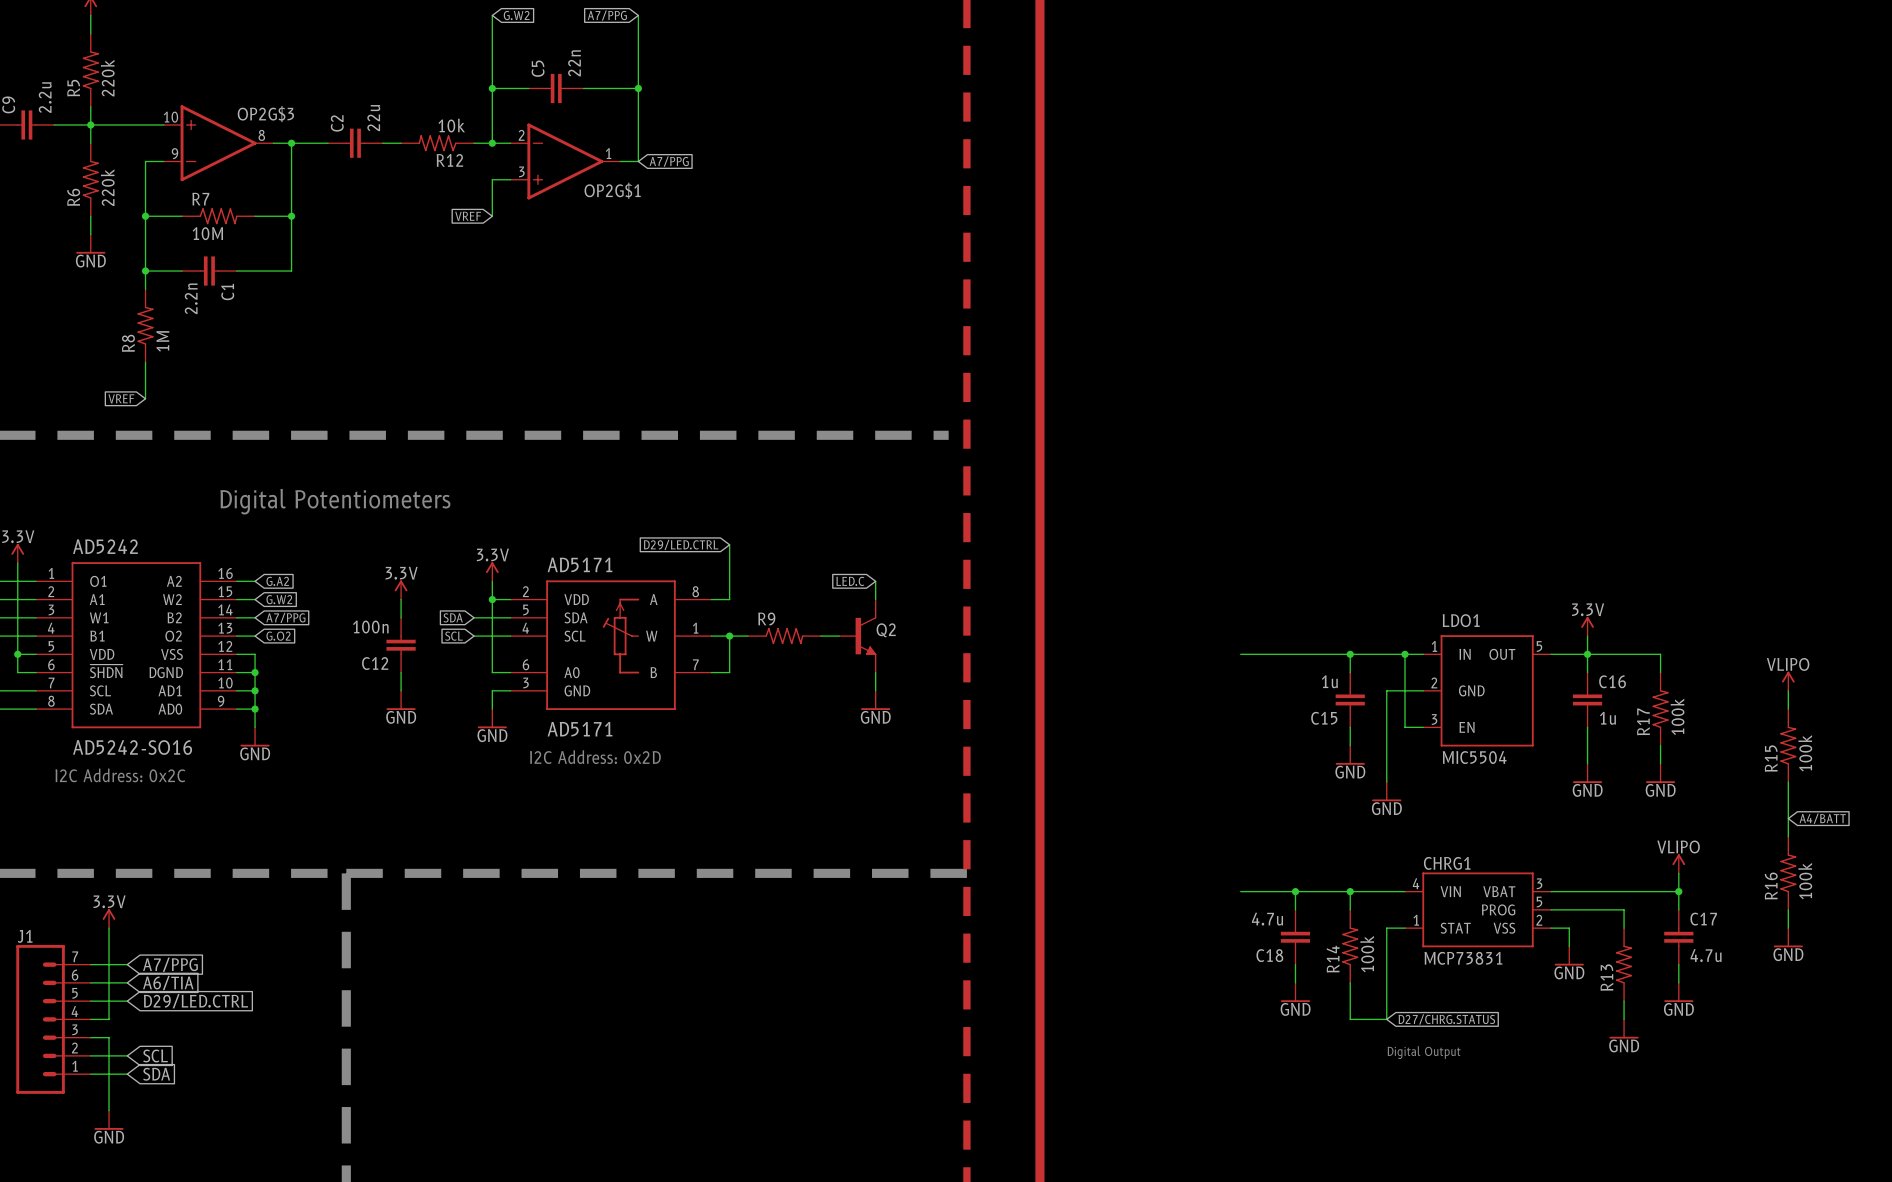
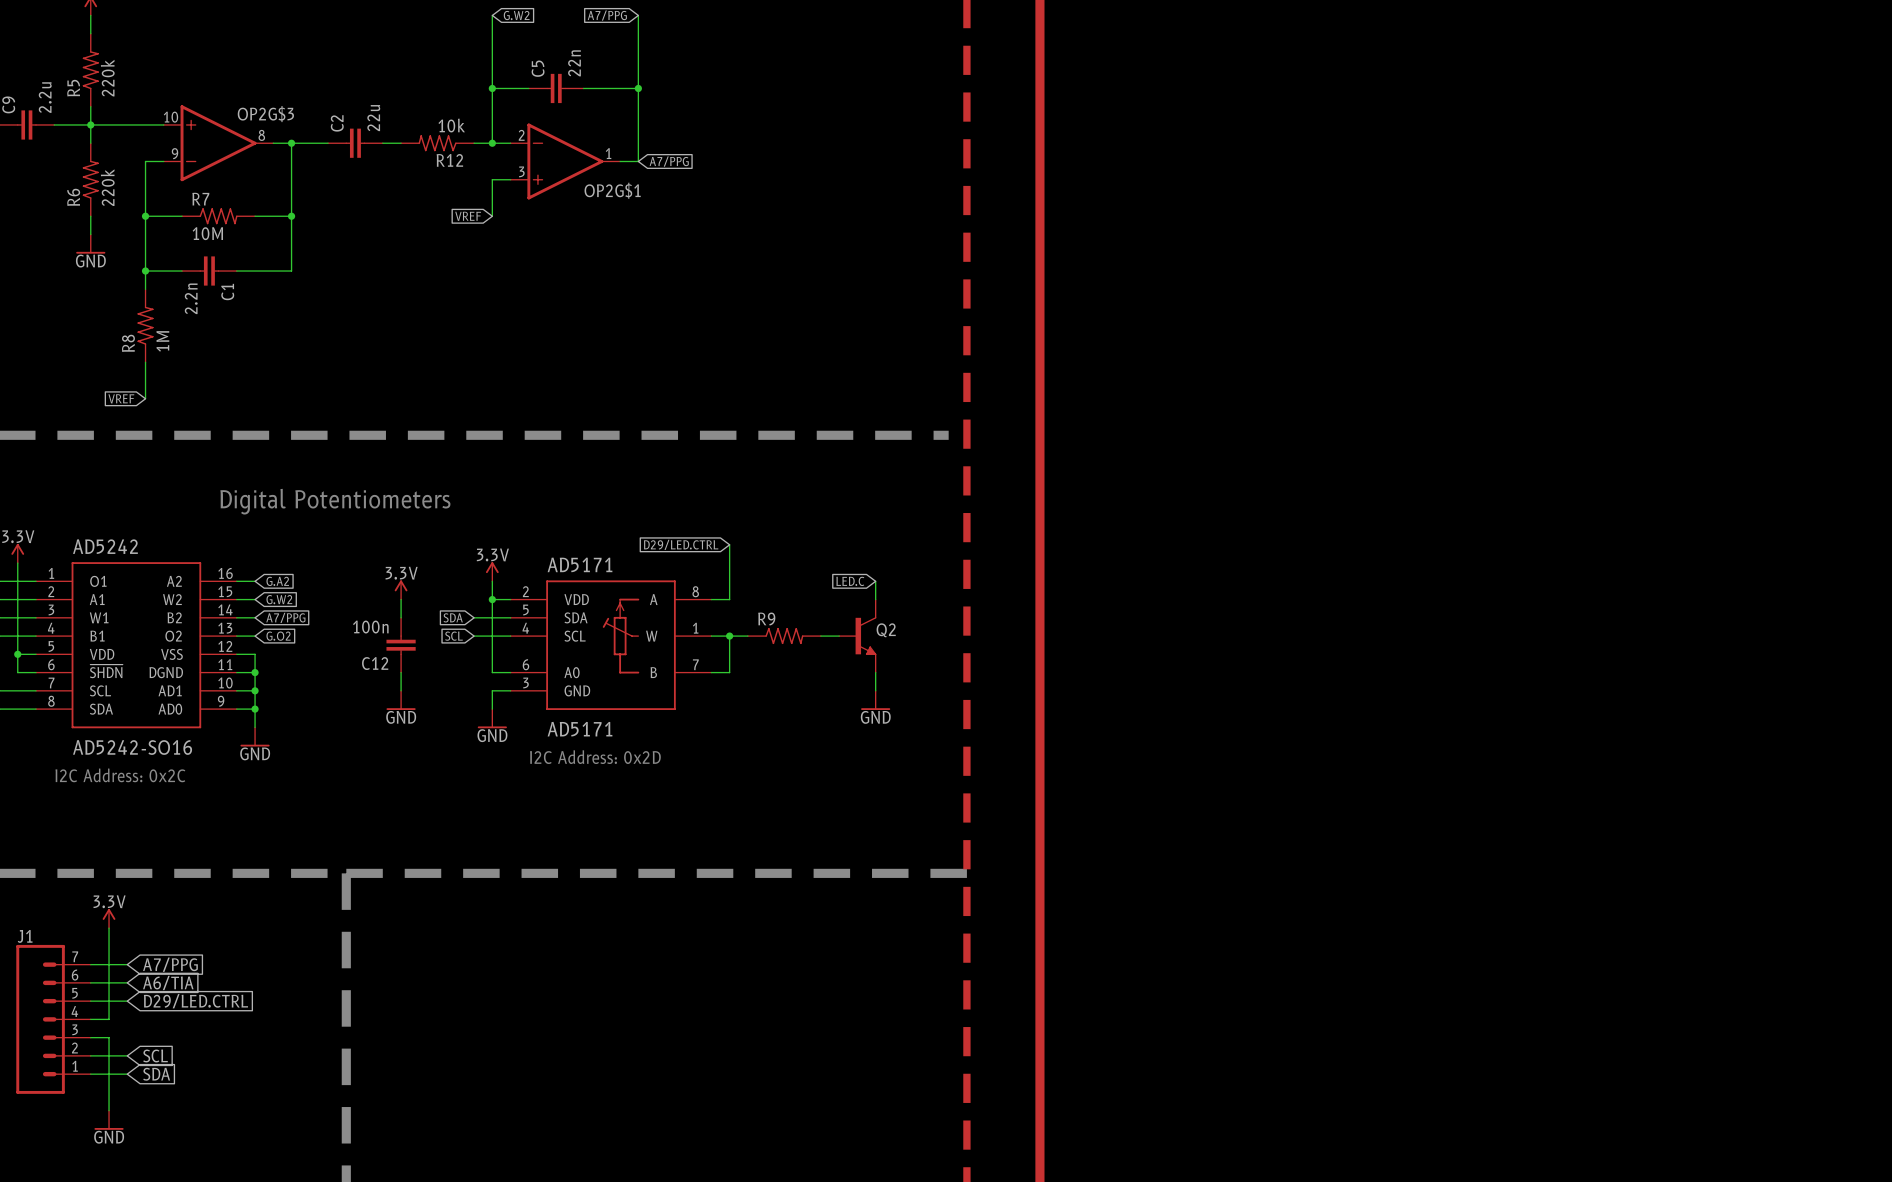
power symbol: 3.3V (1587, 626) -> none
wire: (1587, 636) (1587, 672) -> none
wire: (1240, 654) (1423, 654) -> none
wire: (1350, 654) (1350, 672) -> none
junction: (1350, 654) -> none
wire: (1405, 654) (1405, 727) (1423, 727) -> none
junction: (1405, 654) -> none
wire: (1551, 654) (1660, 654) (1660, 672) -> none
junction: (1587, 654) -> none
power symbol: VLIPO (1788, 681) -> none
wire: (1423, 690) (1386, 690) (1386, 782) -> none
LDO1: MIC5504 (1487, 690) -> none
wire: (1788, 690) (1788, 709) -> none
C15: 1u (1350, 699) -> none
C16: 1u (1587, 699) -> none
R17: 100k (1660, 709) -> none
wire: (1350, 727) (1350, 745) -> none
wire: (1587, 727) (1587, 763) -> none
wire: (1660, 745) (1660, 763) -> none
R15: 100k (1788, 745) -> none
power symbol: GND (1350, 755) -> none
power symbol: GND (1587, 773) -> none
power symbol: GND (1660, 773) -> none
wire: (1788, 782) (1788, 836) -> none
power symbol: GND (1386, 791) -> none
global label: A4/BATT (1822, 818) -> none
power symbol: VLIPO (1678, 863) -> none
wire: (1678, 873) (1678, 909) -> none
R16: 100k (1788, 873) -> none
wire: (1240, 891) (1405, 891) -> none
wire: (1295, 891) (1295, 909) -> none
junction: (1295, 891) -> none
wire: (1350, 891) (1350, 909) -> none
junction: (1350, 891) -> none
wire: (1551, 891) (1678, 891) -> none
junction: (1678, 891) -> none
CHRG1: MCP73831 (1478, 909) -> none
wire: (1551, 909) (1624, 909) (1624, 928) -> none
wire: (1788, 909) (1788, 928) -> none
wire: (1405, 928) (1386, 928) (1386, 1019) (1350, 1019) (1350, 982) -> none
wire: (1551, 928) (1569, 928) (1569, 946) -> none
C18: 4.7u (1295, 937) -> none
C17: 4.7u (1678, 937) -> none
power symbol: GND (1788, 937) -> none
R14: 100k (1350, 946) -> none
power symbol: GND (1569, 955) -> none
wire: (1295, 964) (1295, 982) -> none
R13: (1624, 964) -> none
wire: (1678, 964) (1678, 982) -> none
power symbol: GND (1295, 992) -> none
power symbol: GND (1678, 992) -> none
wire: (1624, 1001) (1624, 1019) -> none
global label: D27/CHRG.STATUS (1446, 1019) -> none
power symbol: GND (1624, 1028) -> none
text: Digital Output (1424, 1052) -> none

